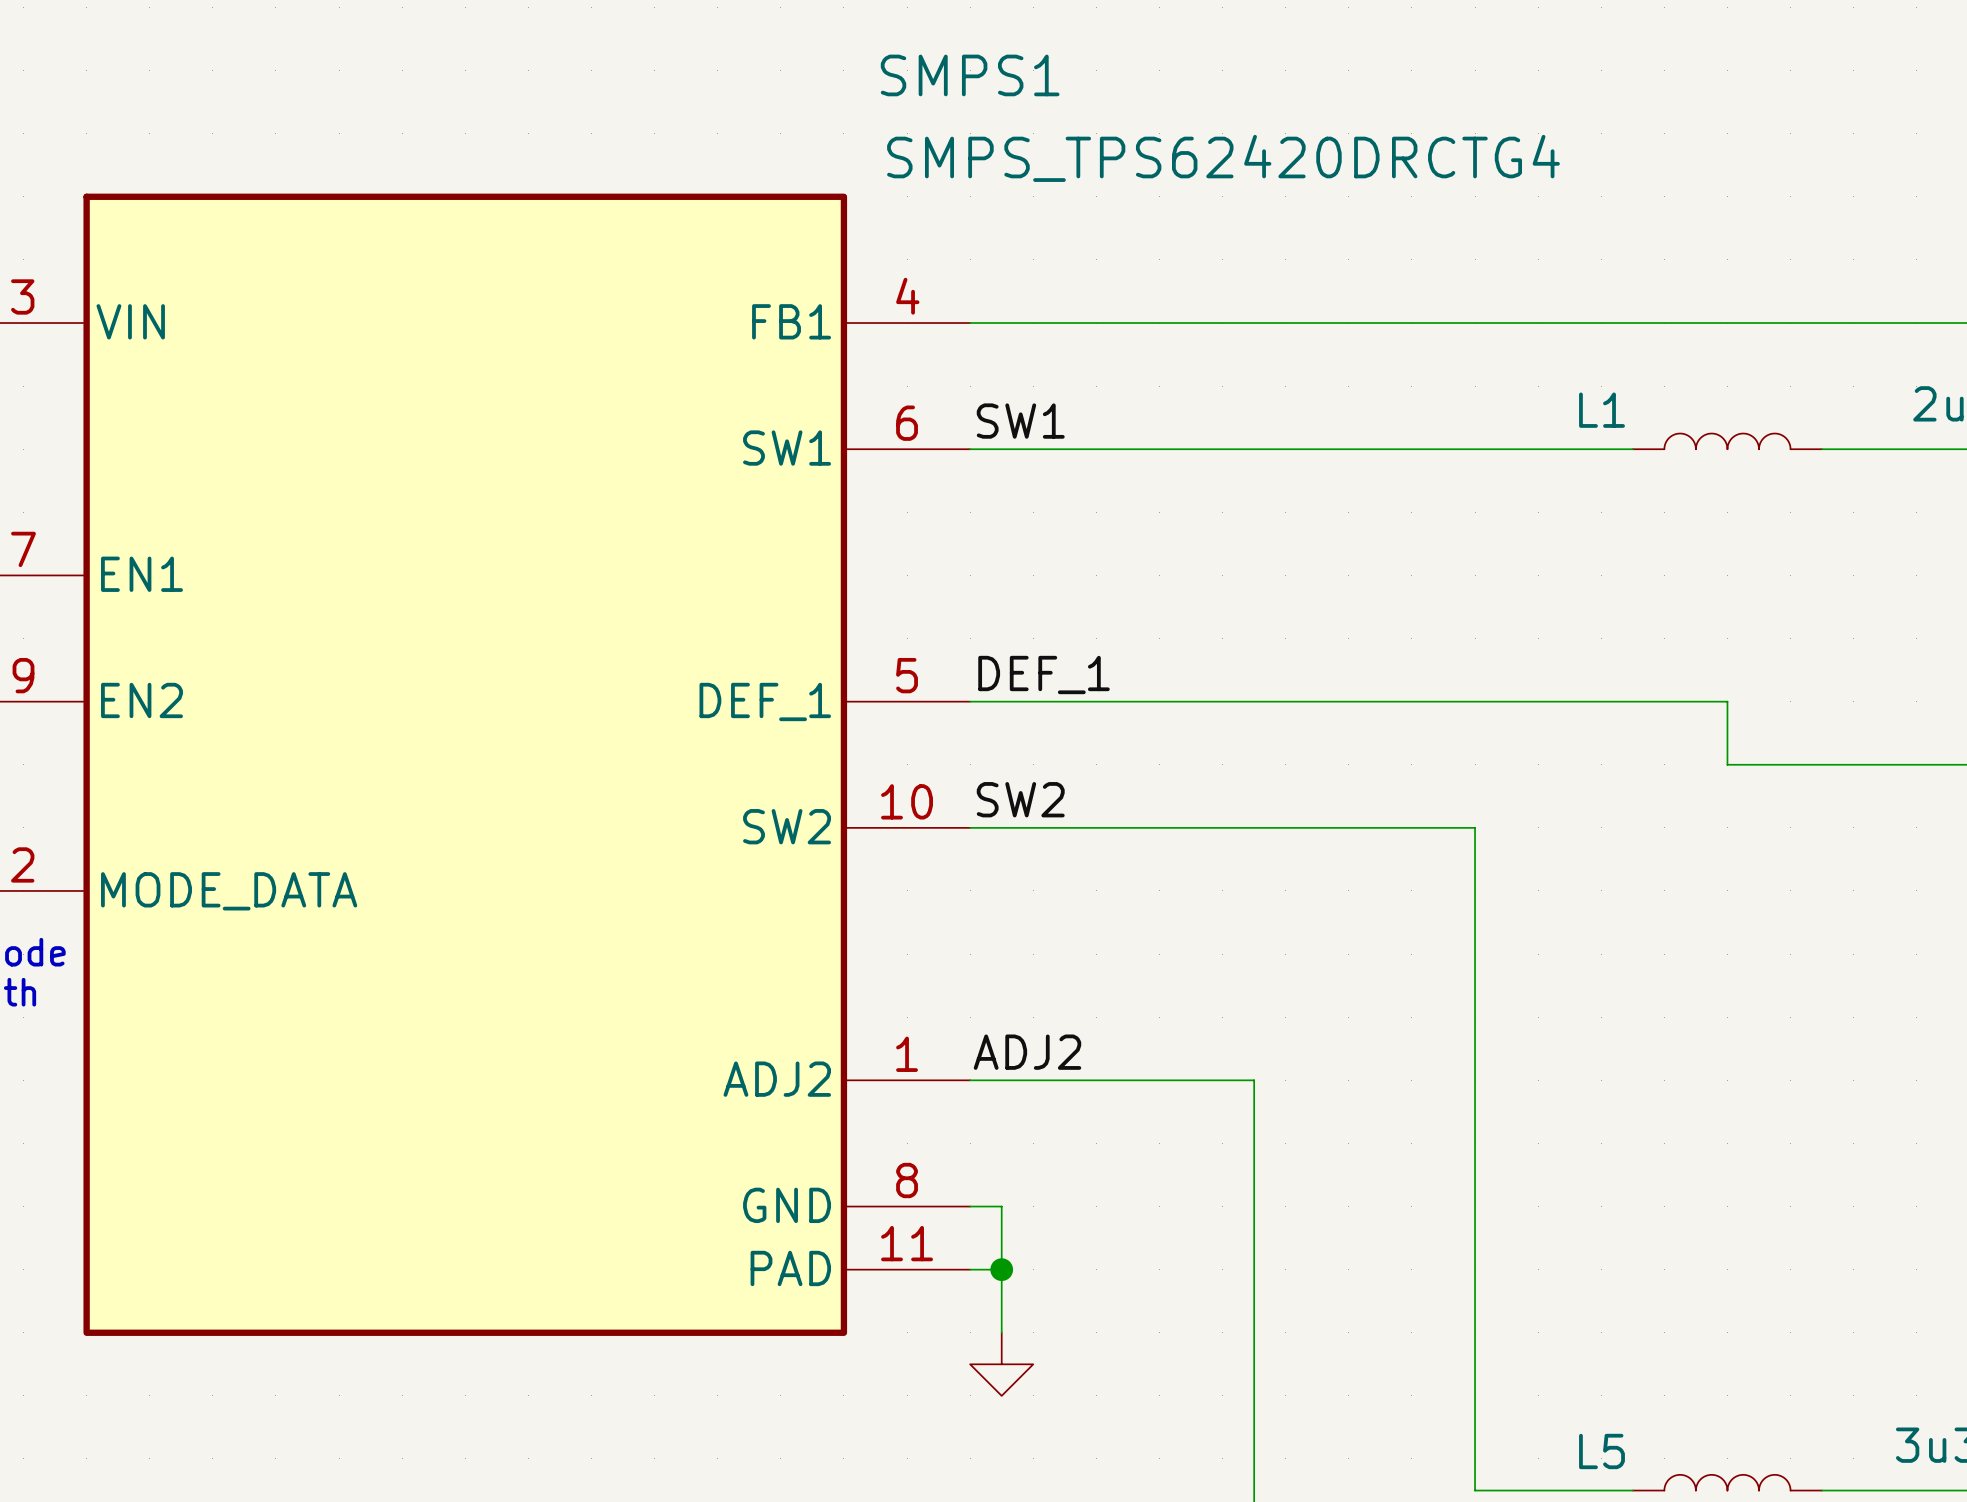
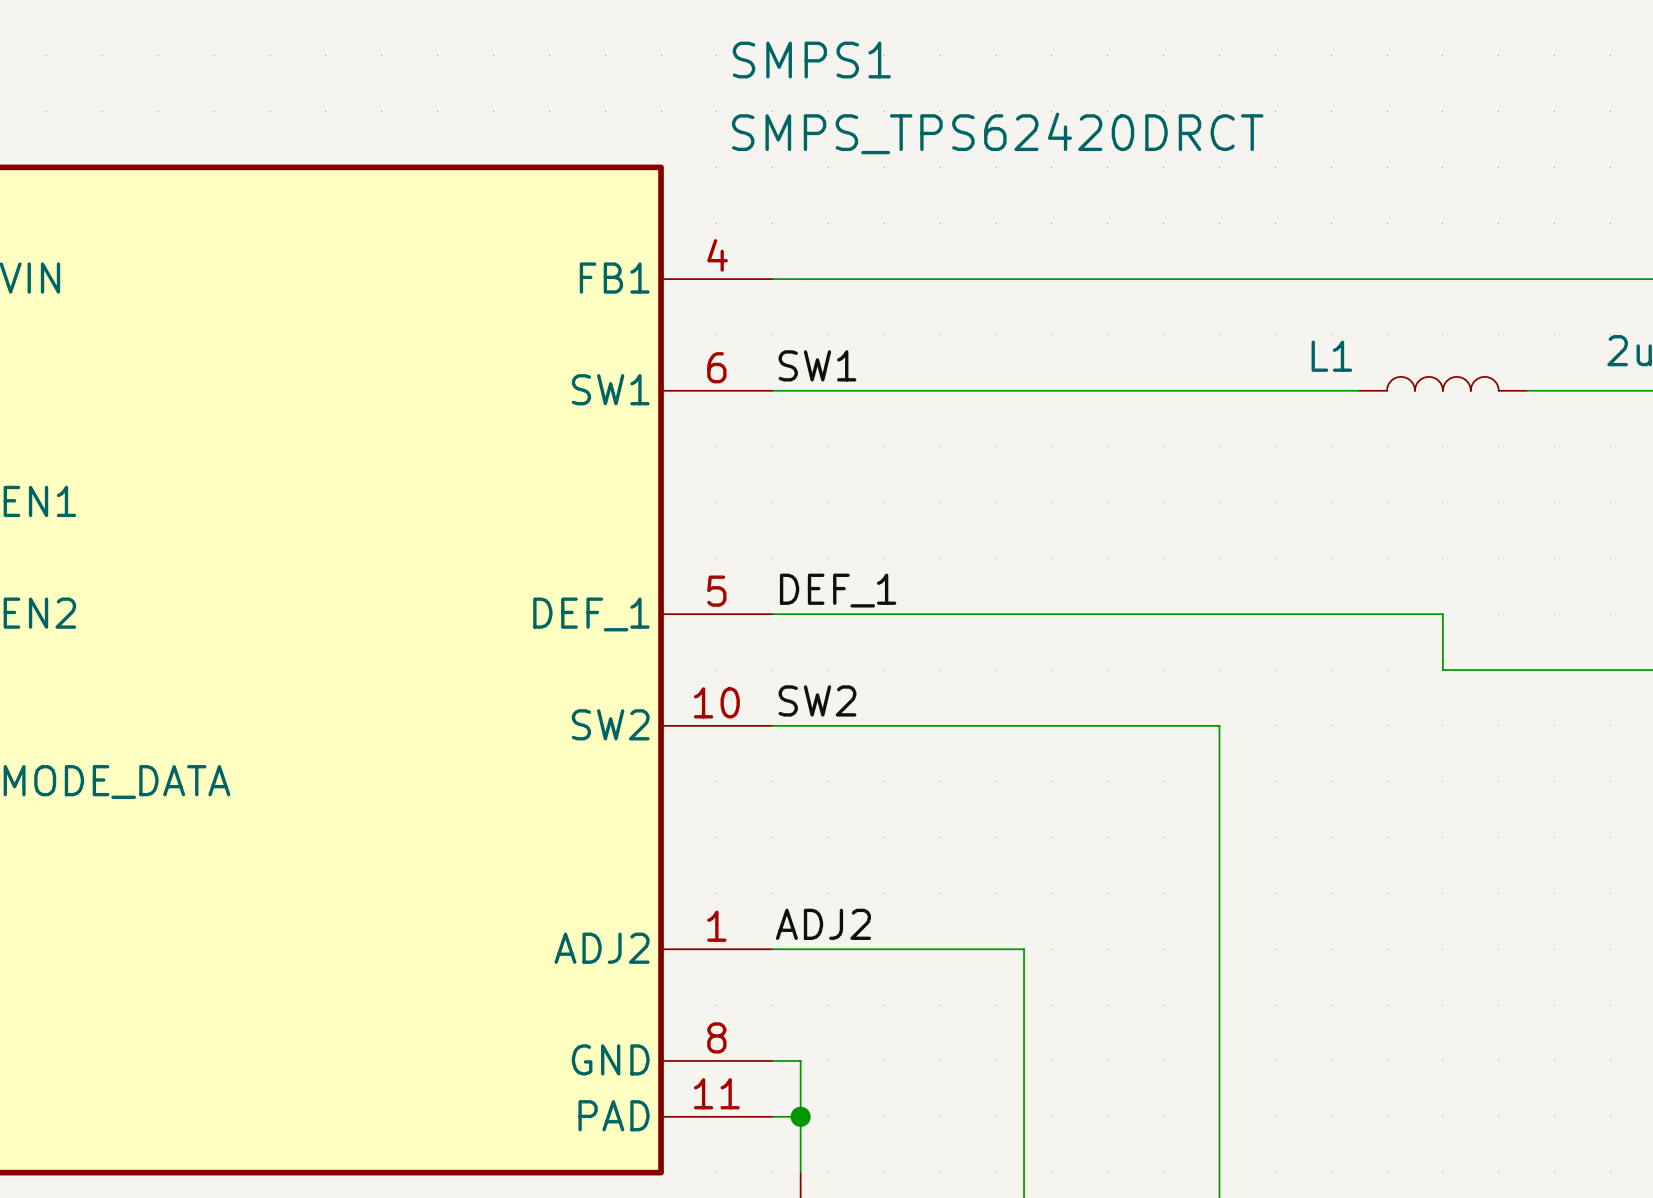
SMPS1 name position: SMPS1 (970, 75) -> SMPS1 (811, 60)
SMPS1 value: SMPS_TPS62420DRCTG4 (1223, 158) -> SMPS_TPS62420DRCT (997, 133)

